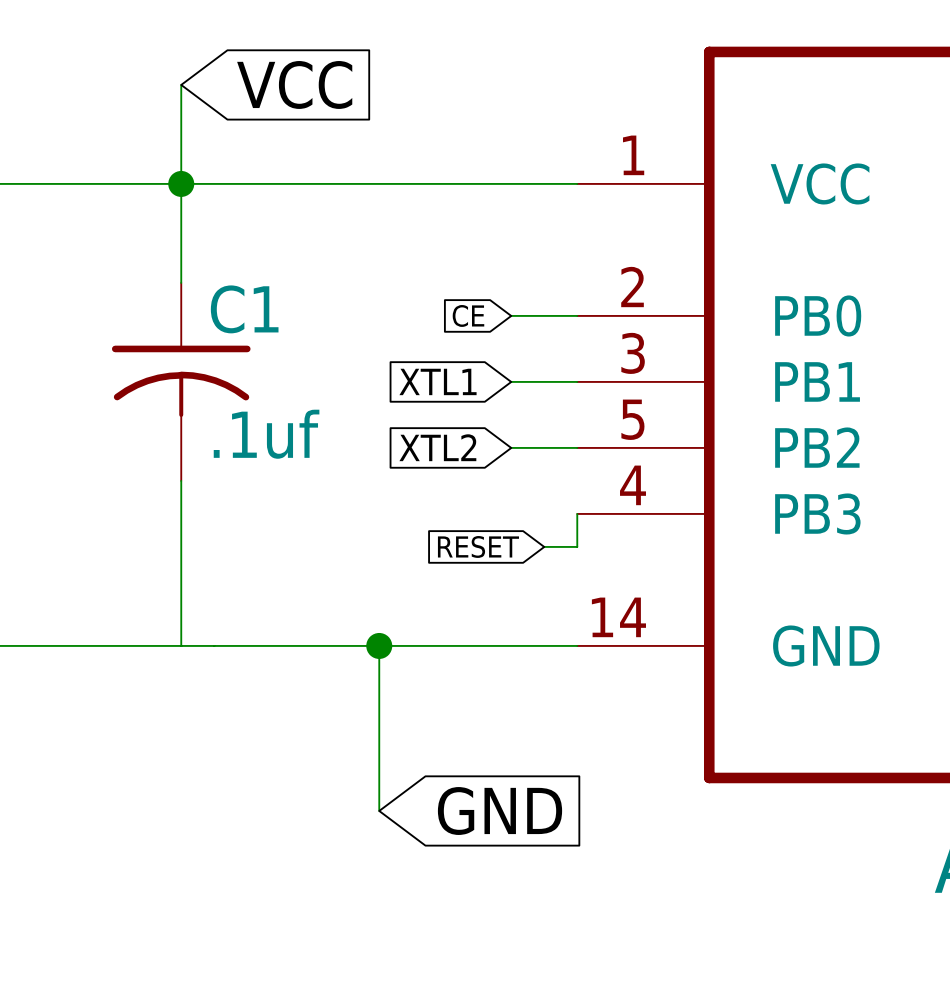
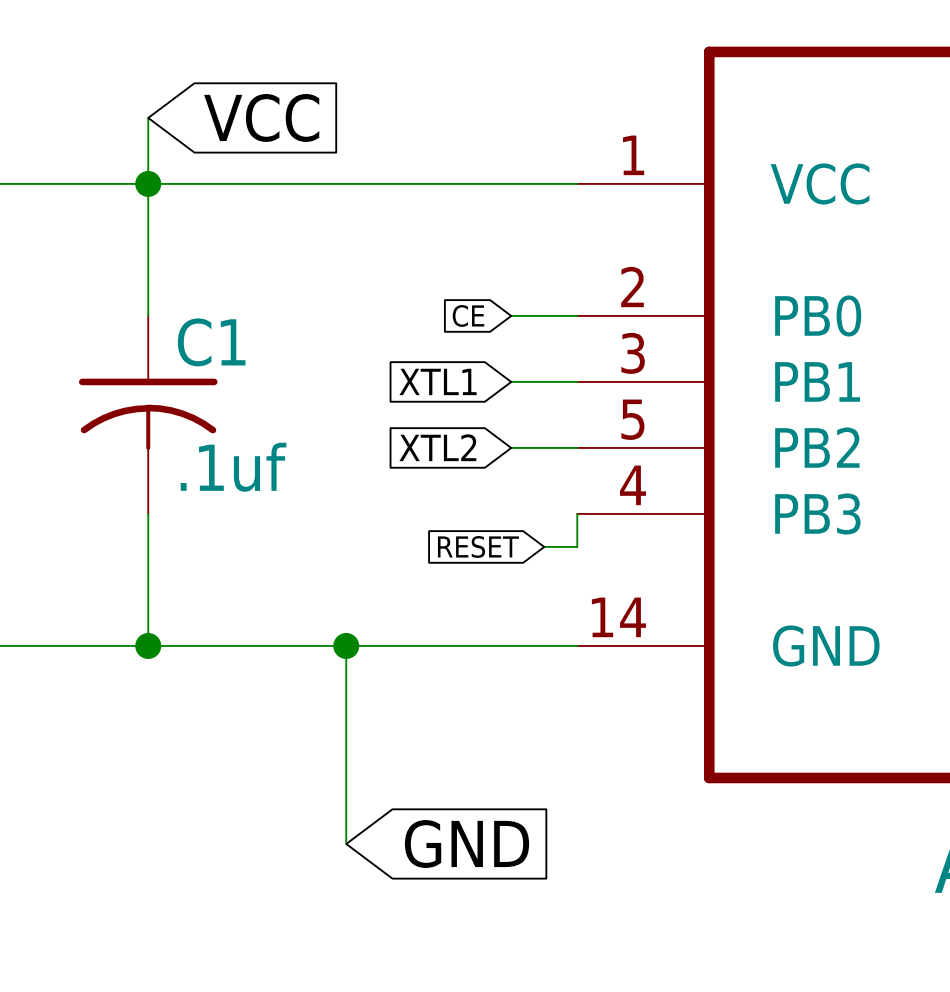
wire: (181, 84) (181, 282) -> (148, 117) (148, 315)
global label position: VCC (294, 84) -> VCC (261, 117)
junction position: (181, 183) -> (148, 183)
C1 position: (181, 381) -> (148, 414)
wire: (181, 480) (181, 645) -> none
wire: none -> (148, 513) (148, 645)
junction: none -> (148, 645)
wire: none -> (346, 645) (346, 843)
wire: (379, 645) (379, 810) -> none
junction position: (379, 645) -> (346, 645)
global label position: GND (500, 811) -> GND (467, 844)

